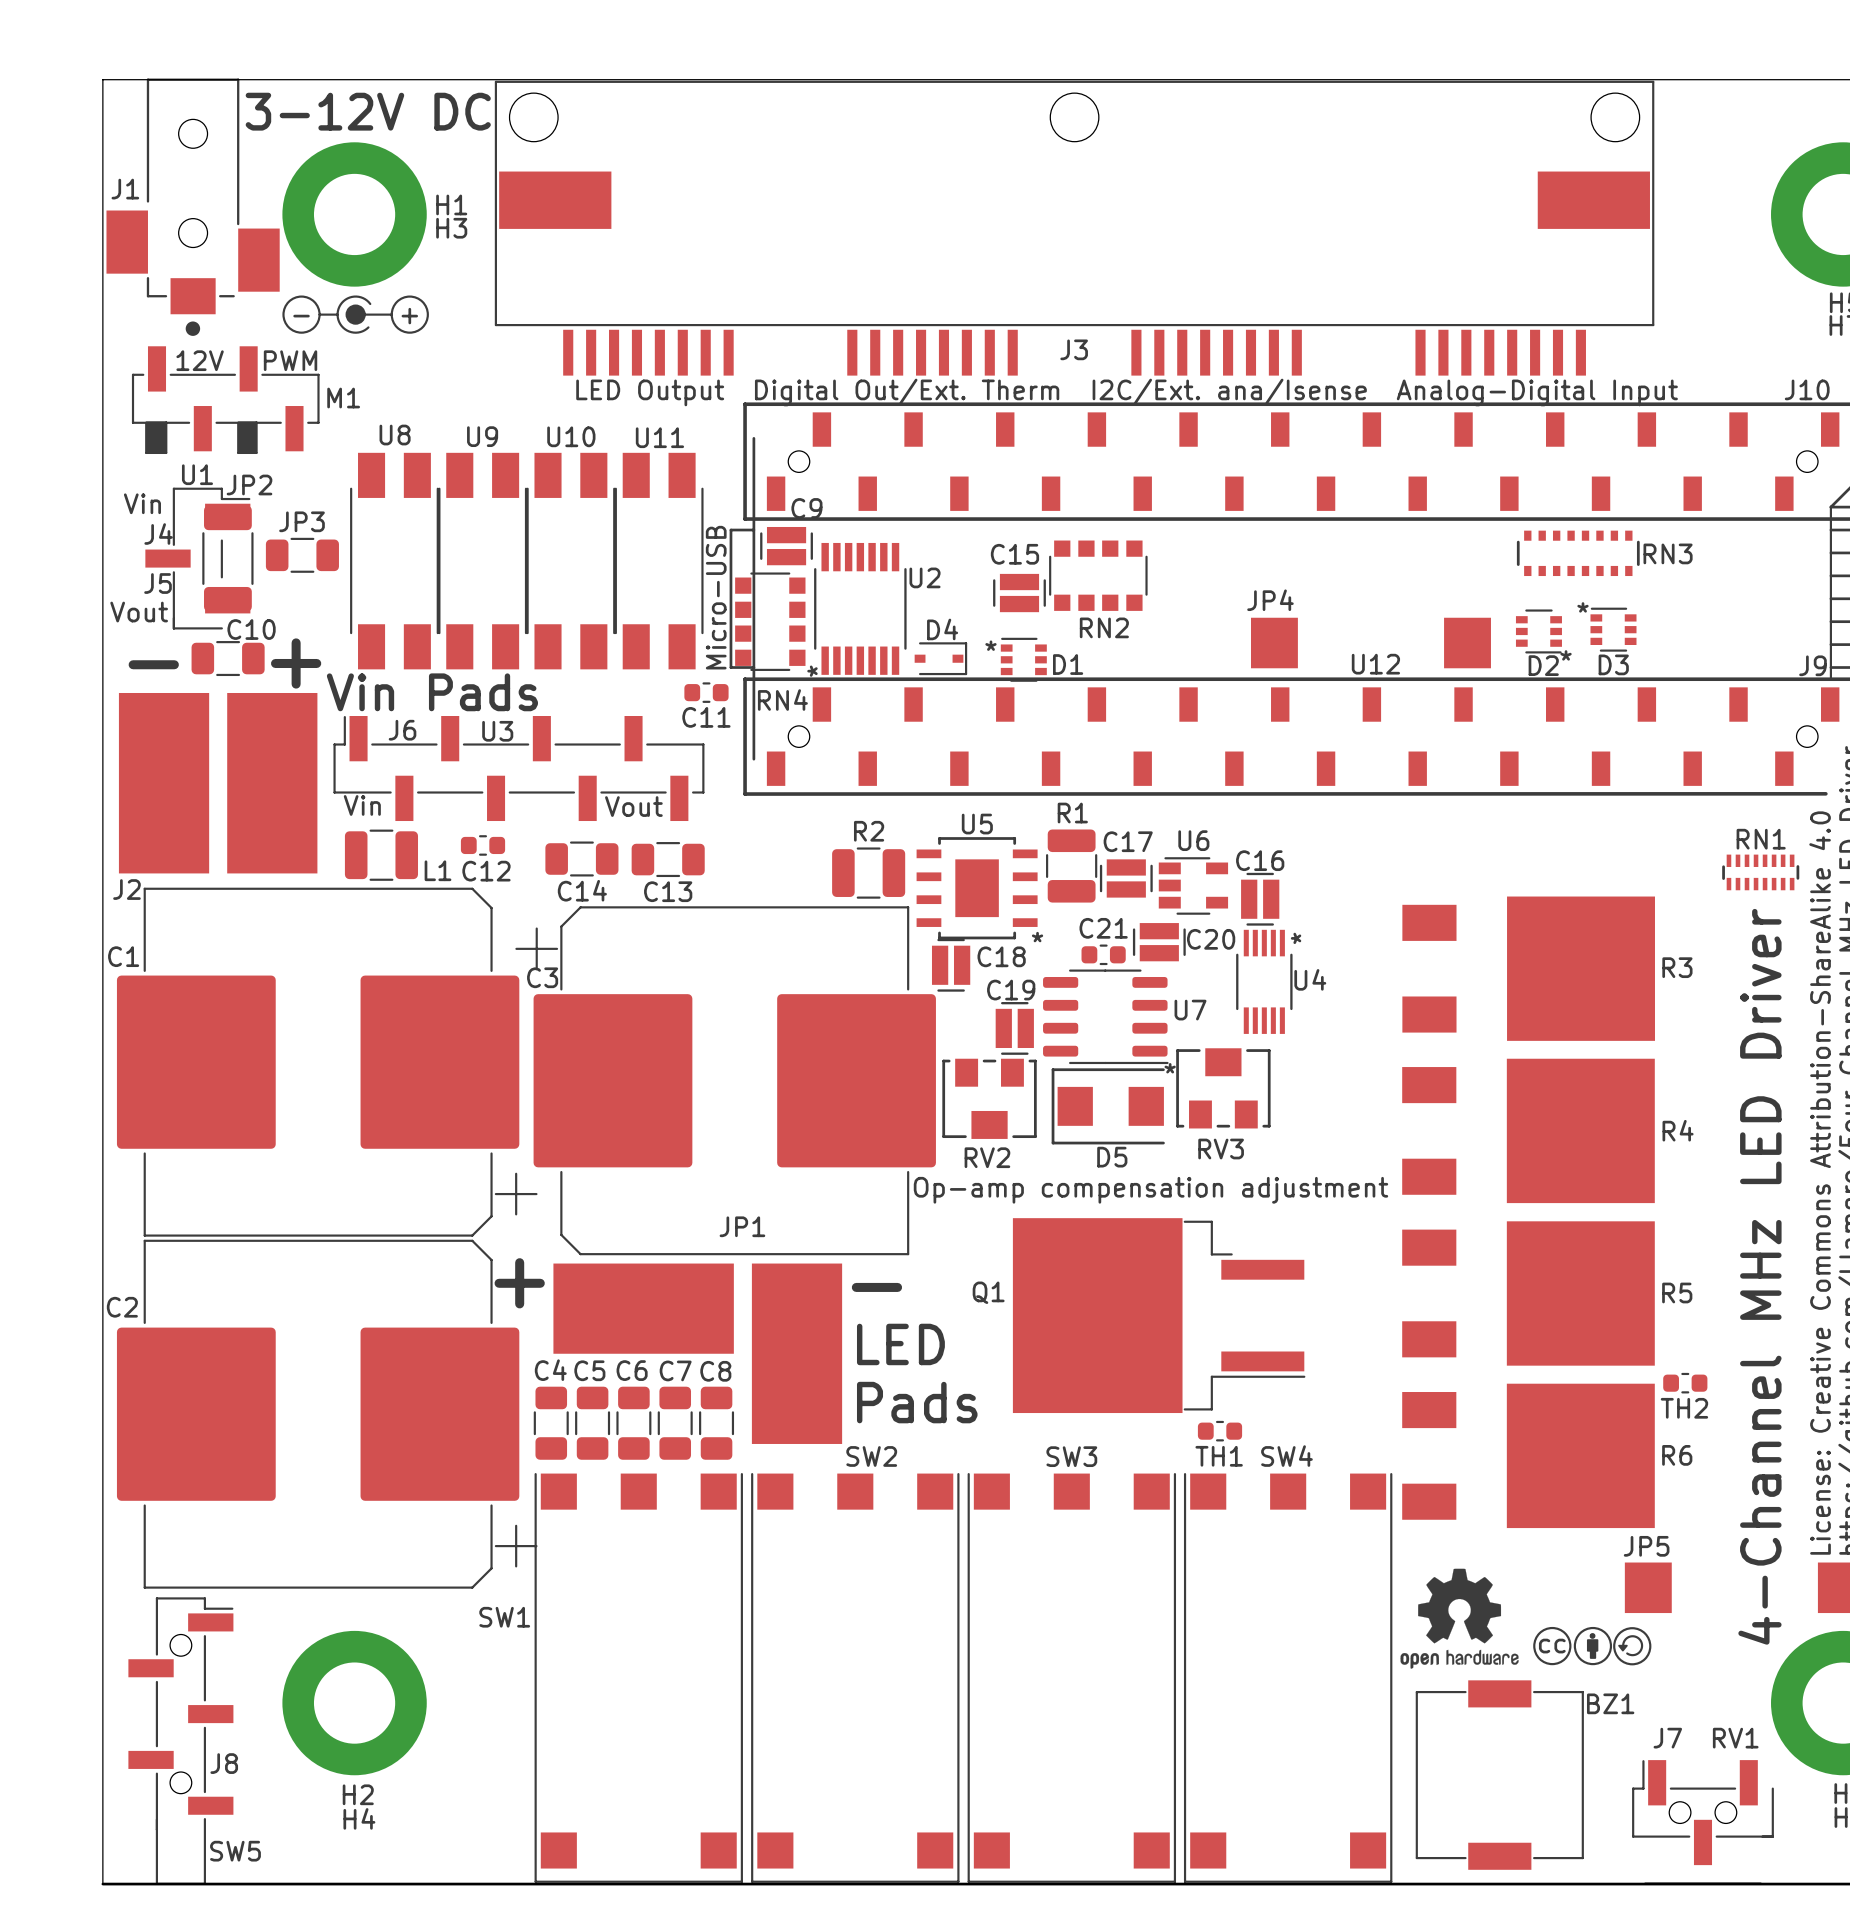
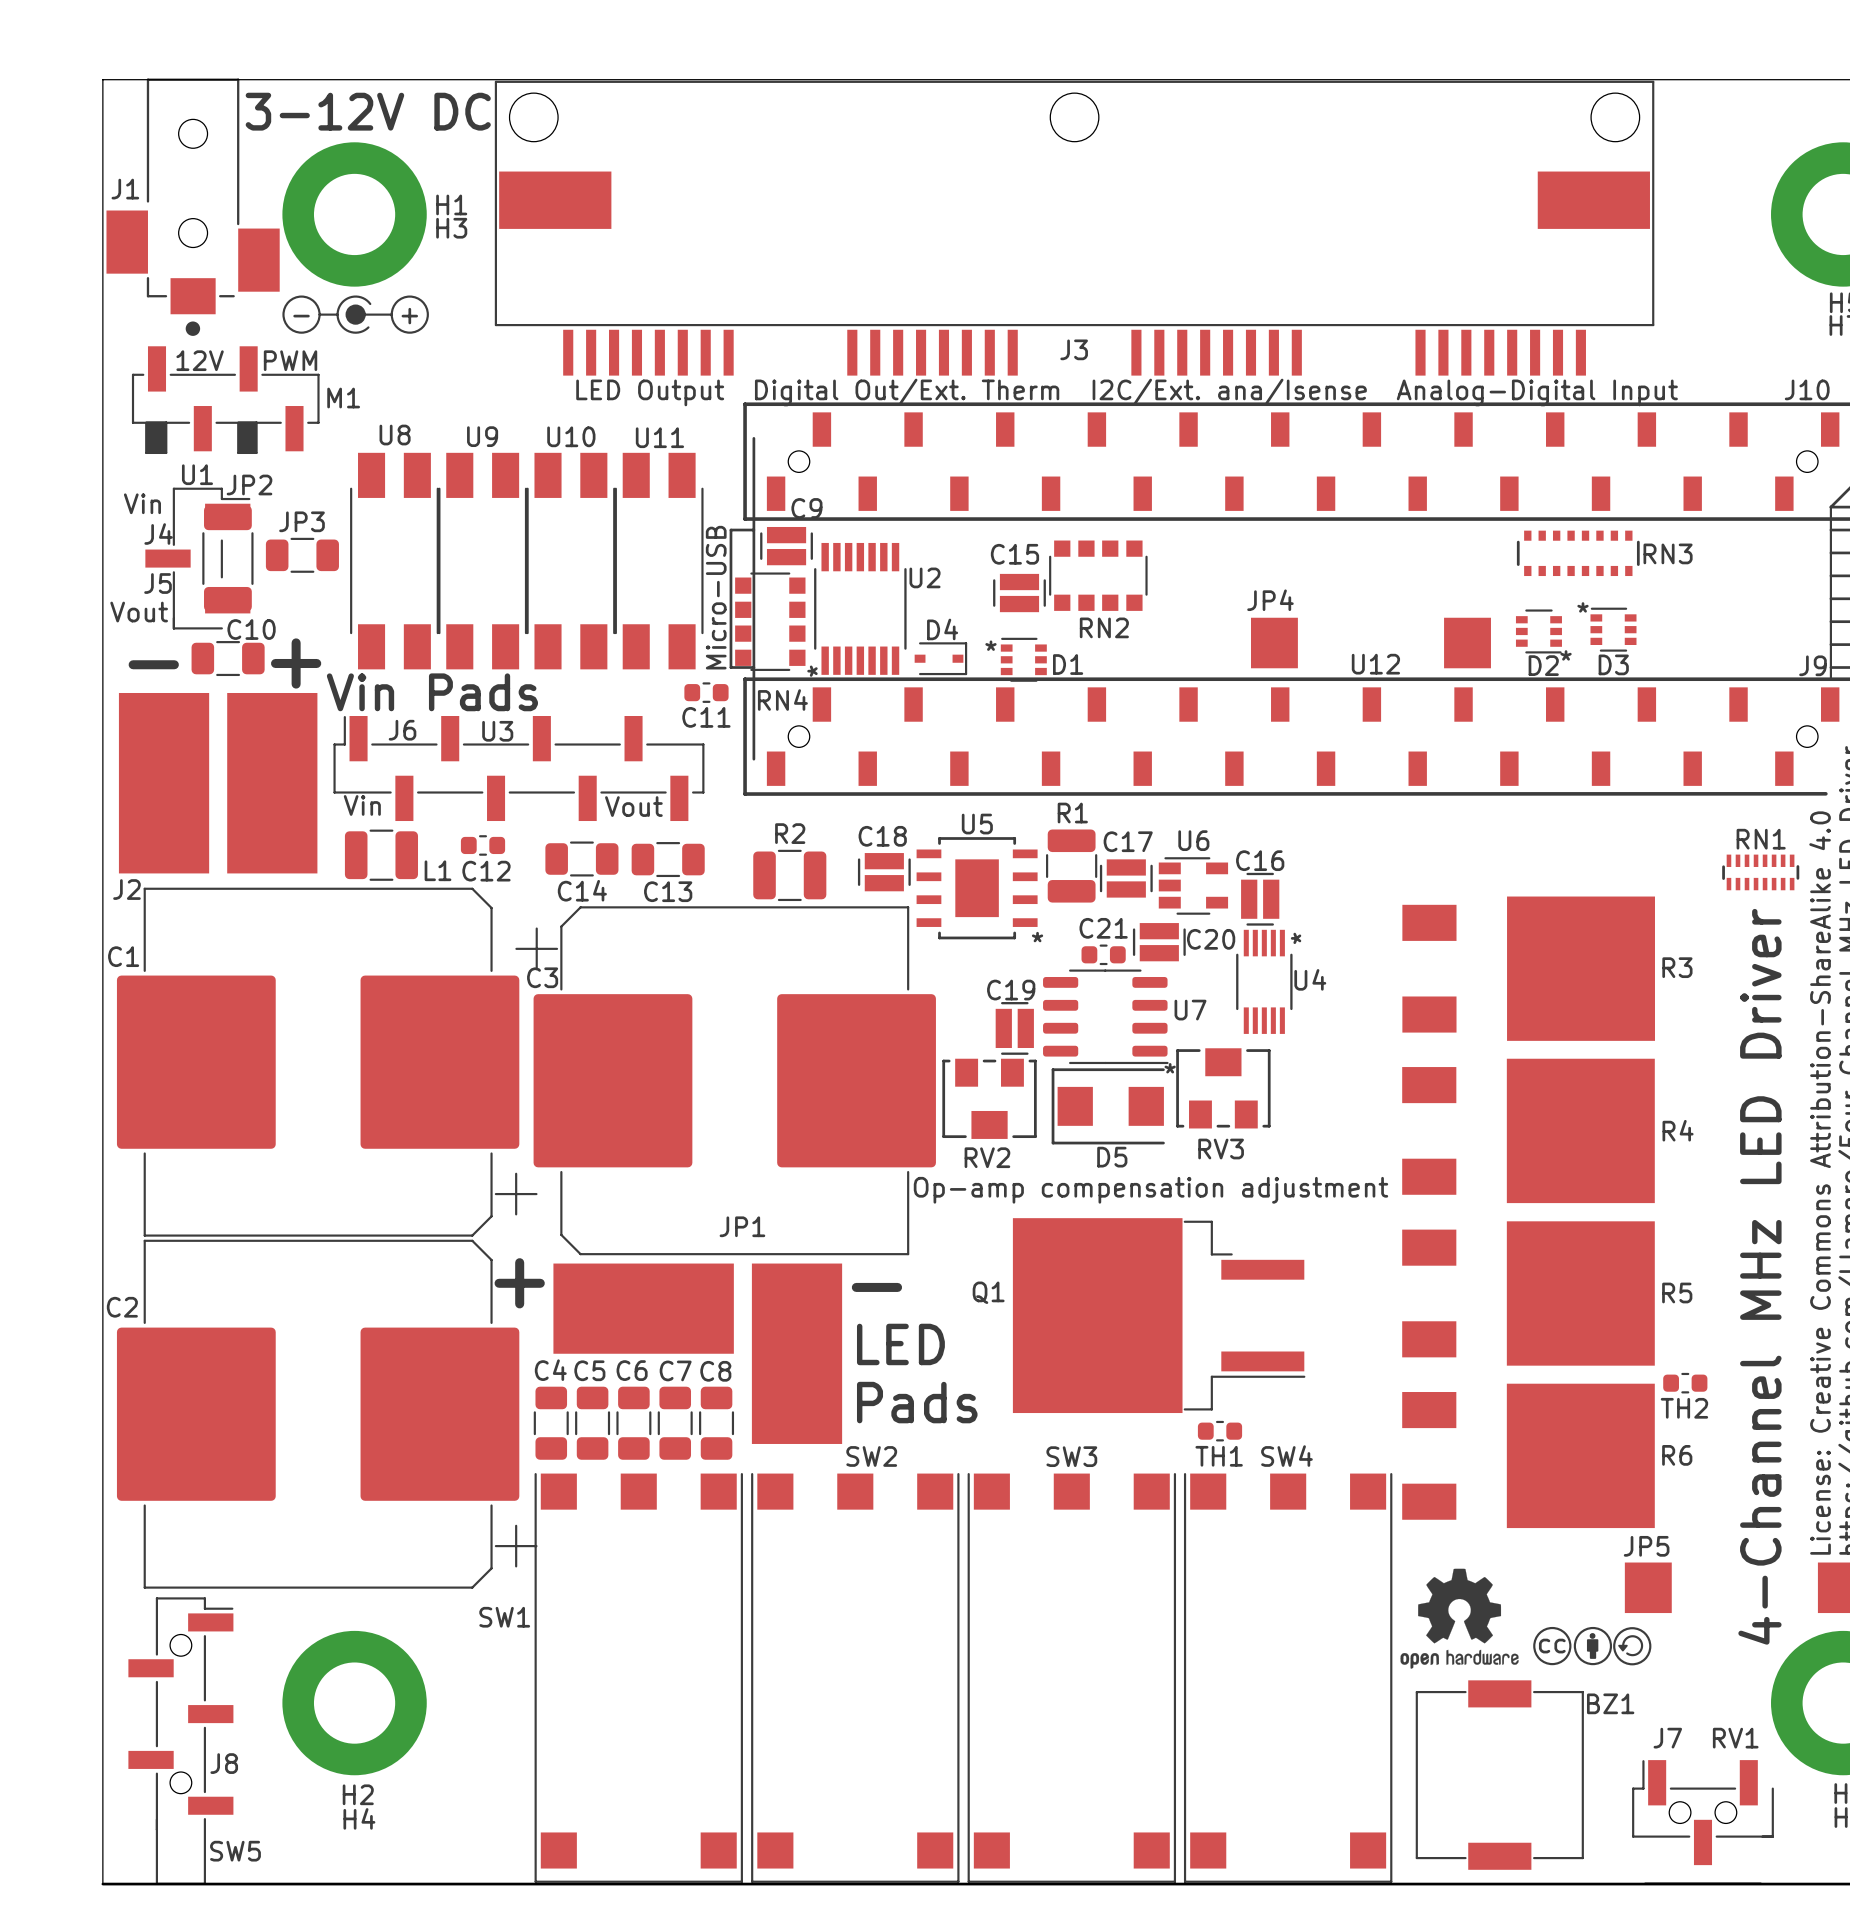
R2 position: (868, 873) -> (789, 875)
C18 name position: C18 (1001, 956) -> C18 (882, 836)
C18 rotation: 0° (951, 965) -> 90° clockwise (884, 872)
C18 position: (951, 965) -> (884, 872)

